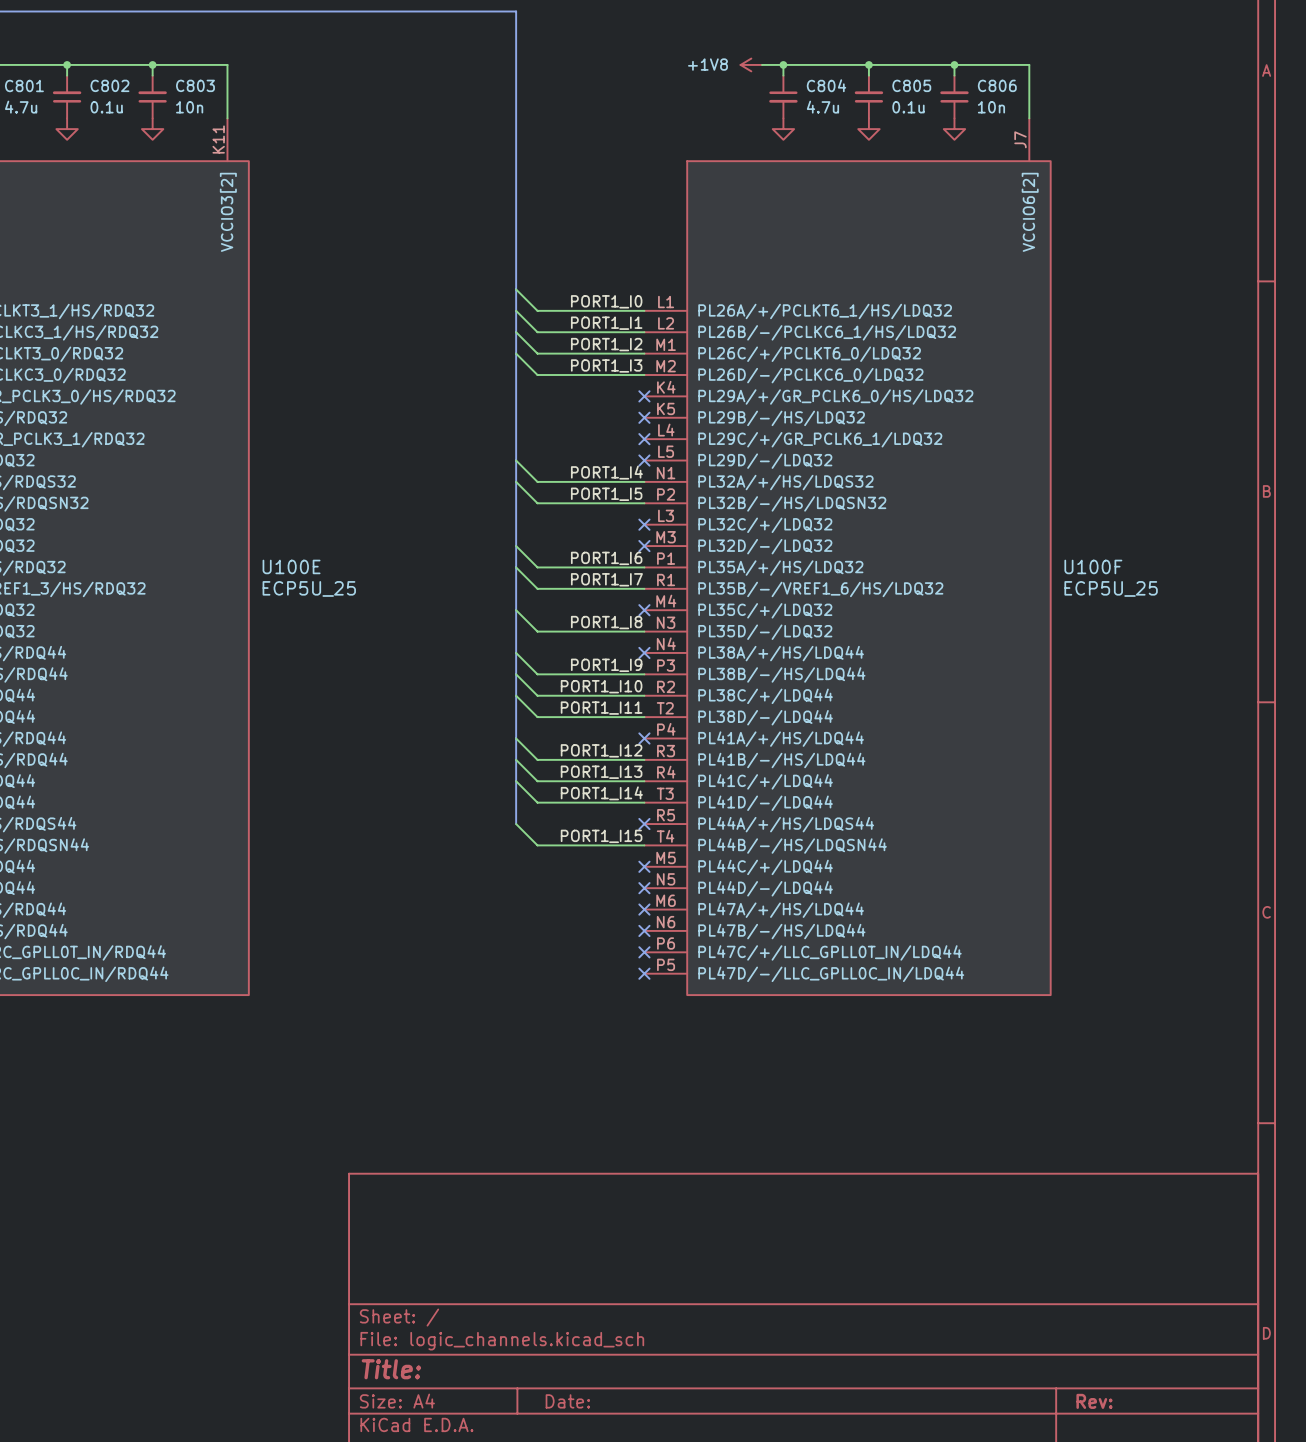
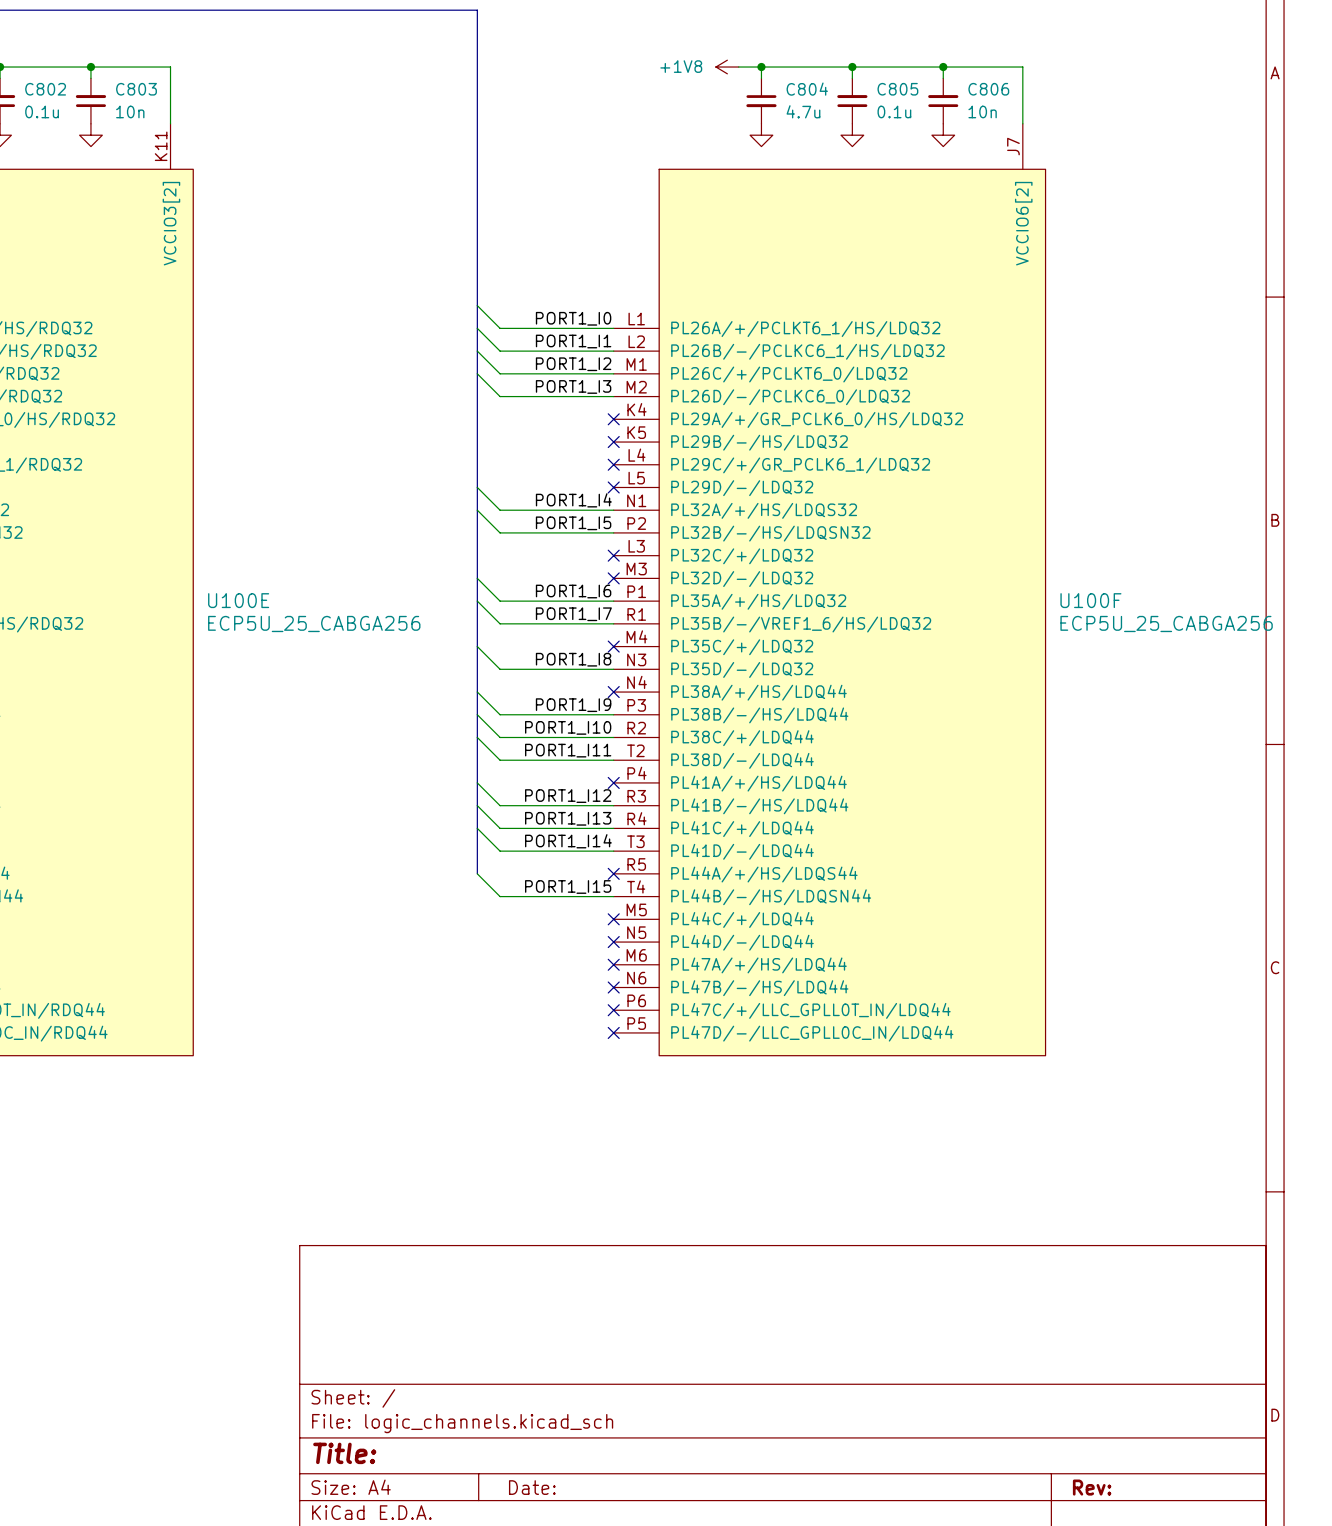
U100E value: ECP5U_25 (309, 588) -> ECP5U_25_CABGA256 (314, 623)
U100F value: ECP5U_25 (1111, 588) -> ECP5U_25_CABGA256 (1166, 623)

